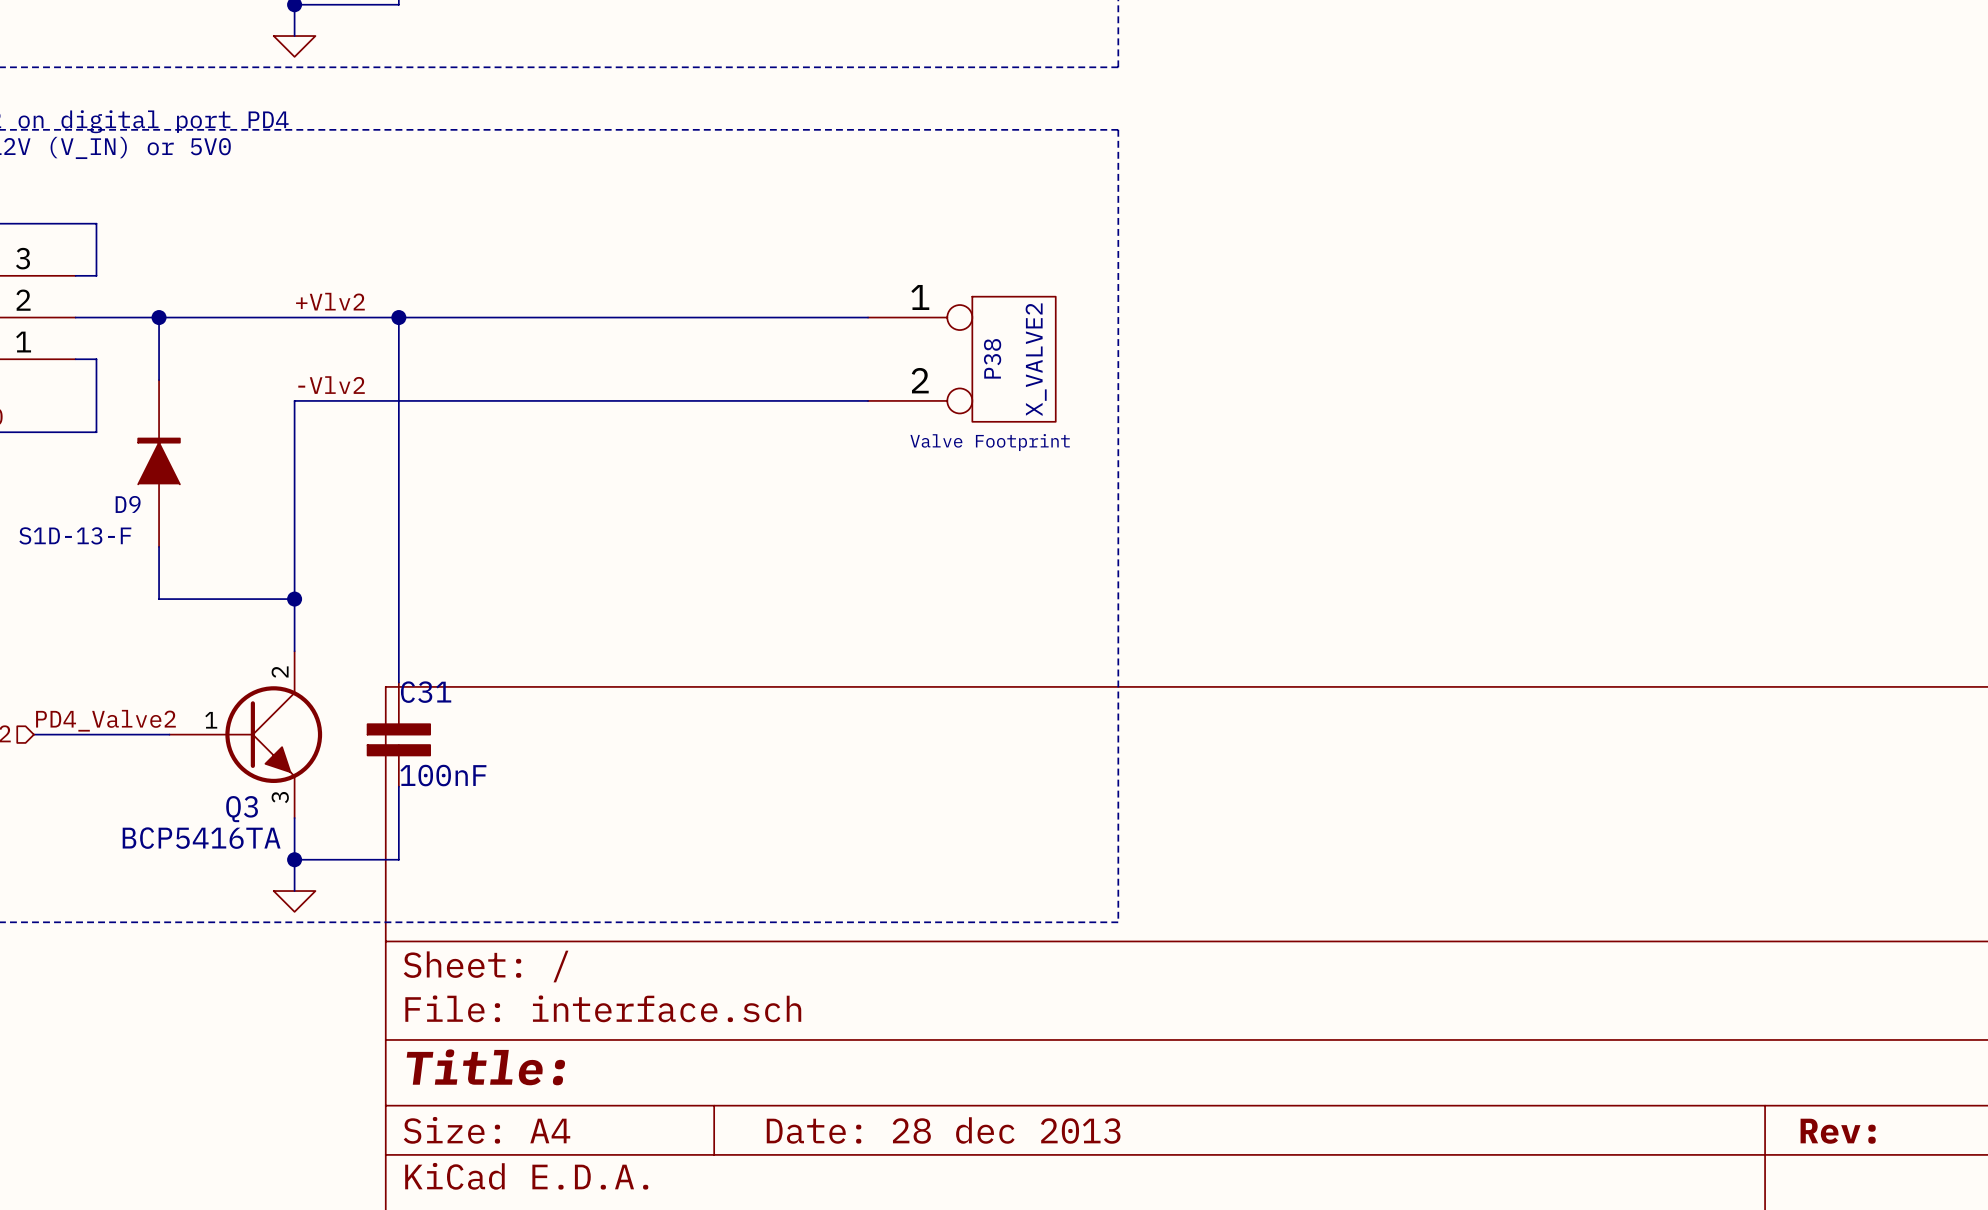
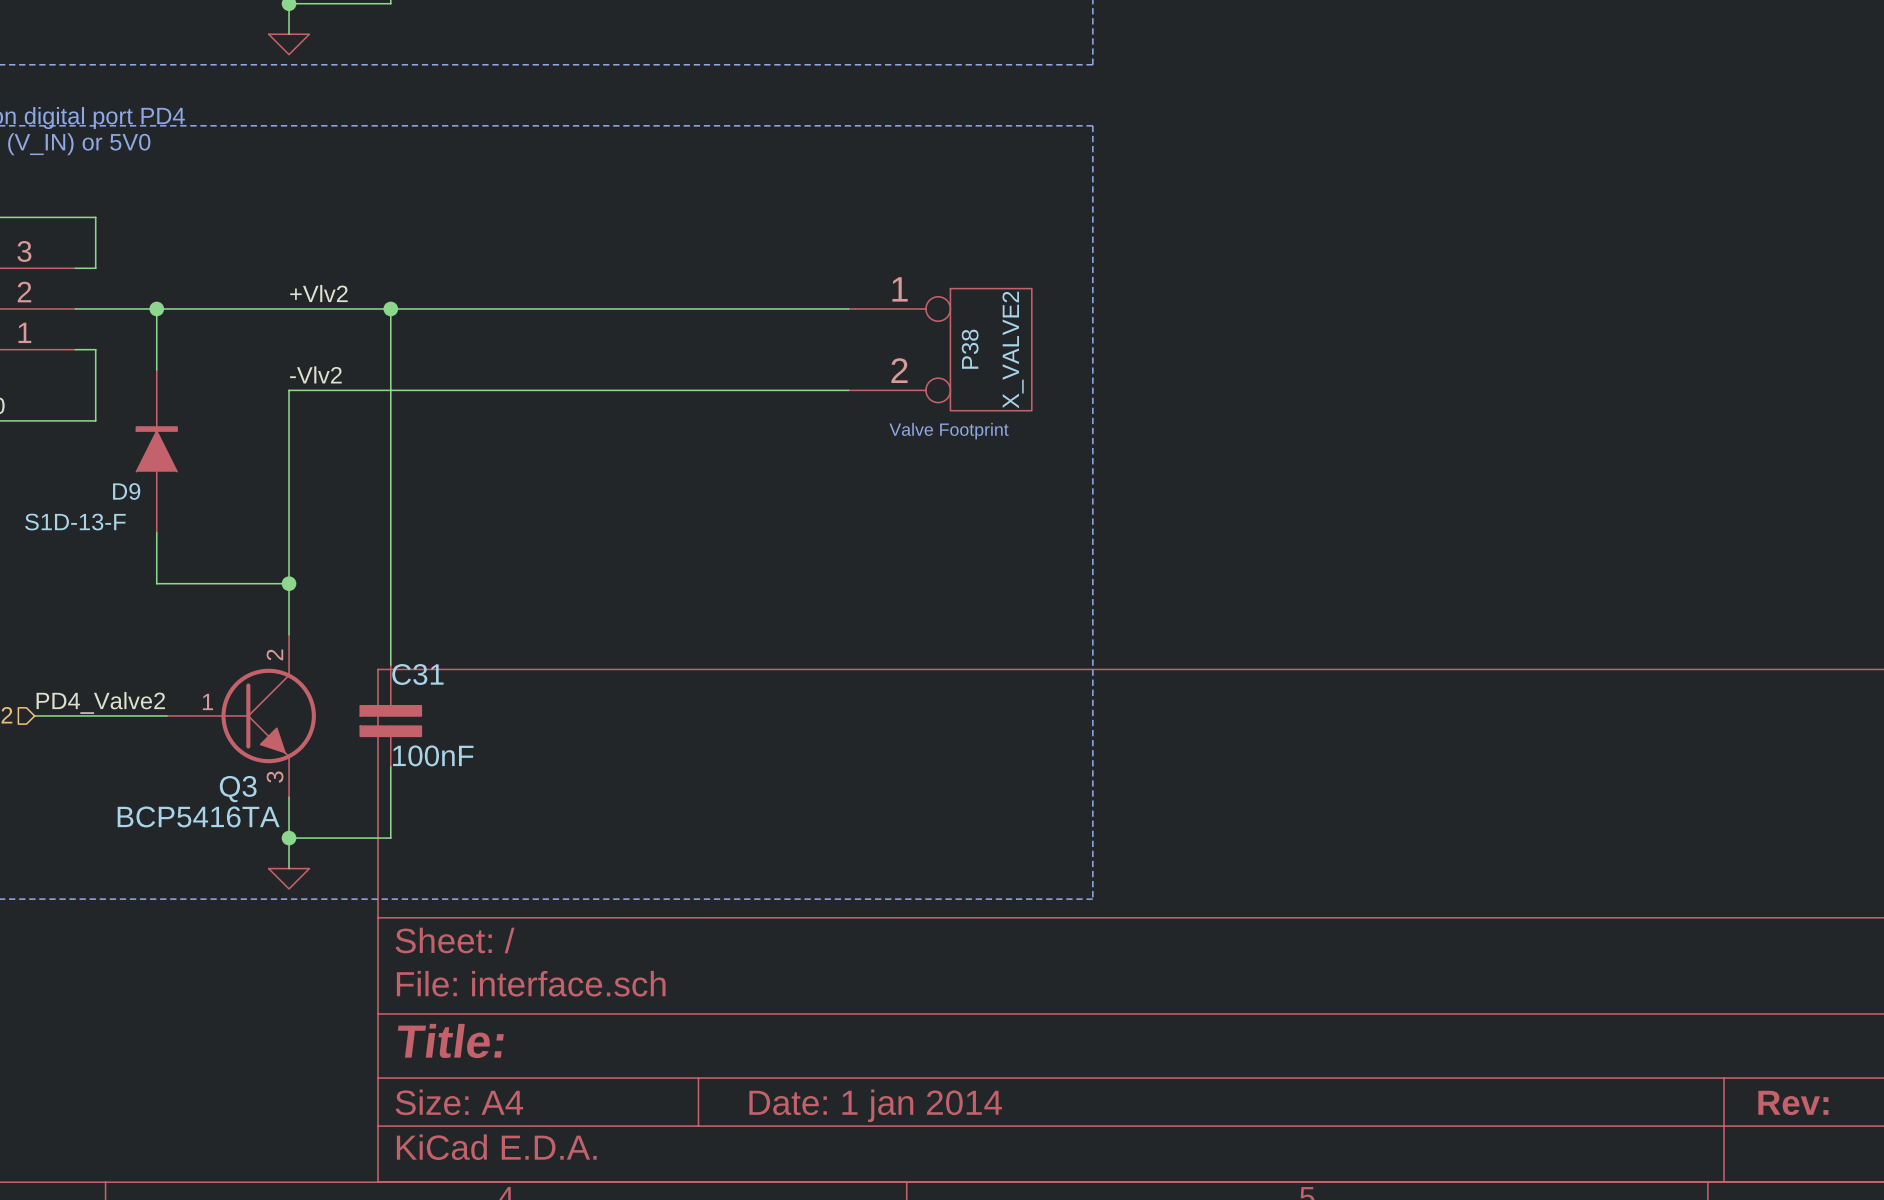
title block: Date: 28 dec 2013 (943, 1130) -> Date: 1 jan 2014 (875, 1105)

